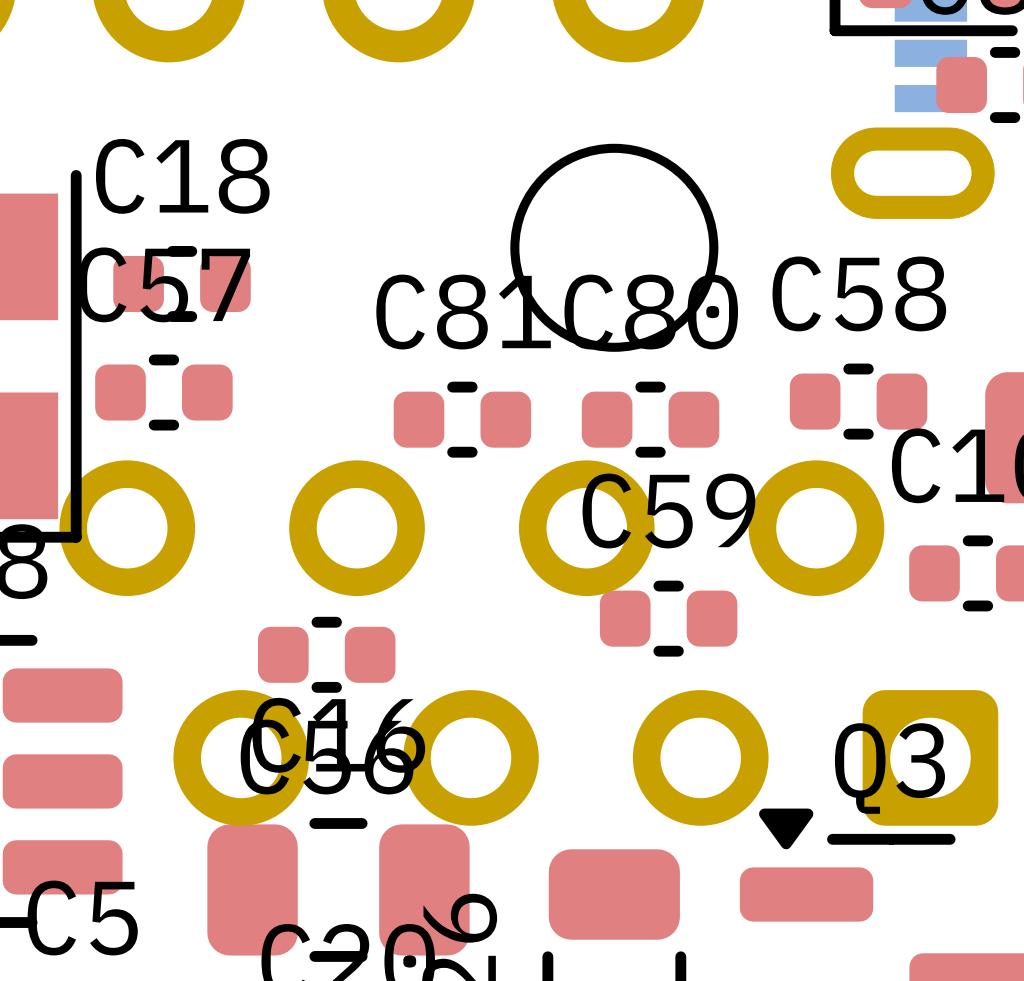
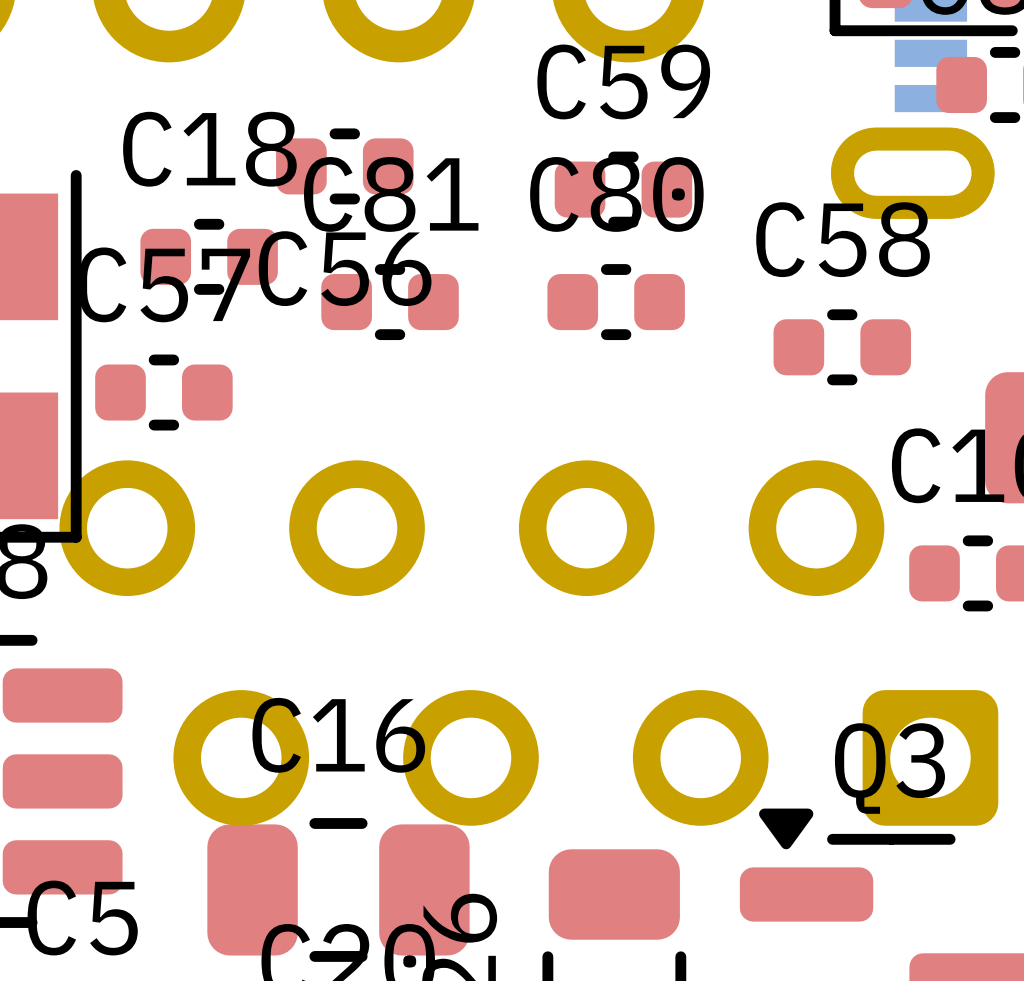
round board edge: [510, 143, 719, 352] -> none
C18 position: (182, 283) -> (209, 256)
C58 position: (858, 401) -> (842, 347)
C81 position: (462, 419) -> (390, 302)
C80 position: (650, 419) -> (616, 302)
C59 position: (668, 618) -> (623, 189)
C56 position: (326, 654) -> (344, 166)

